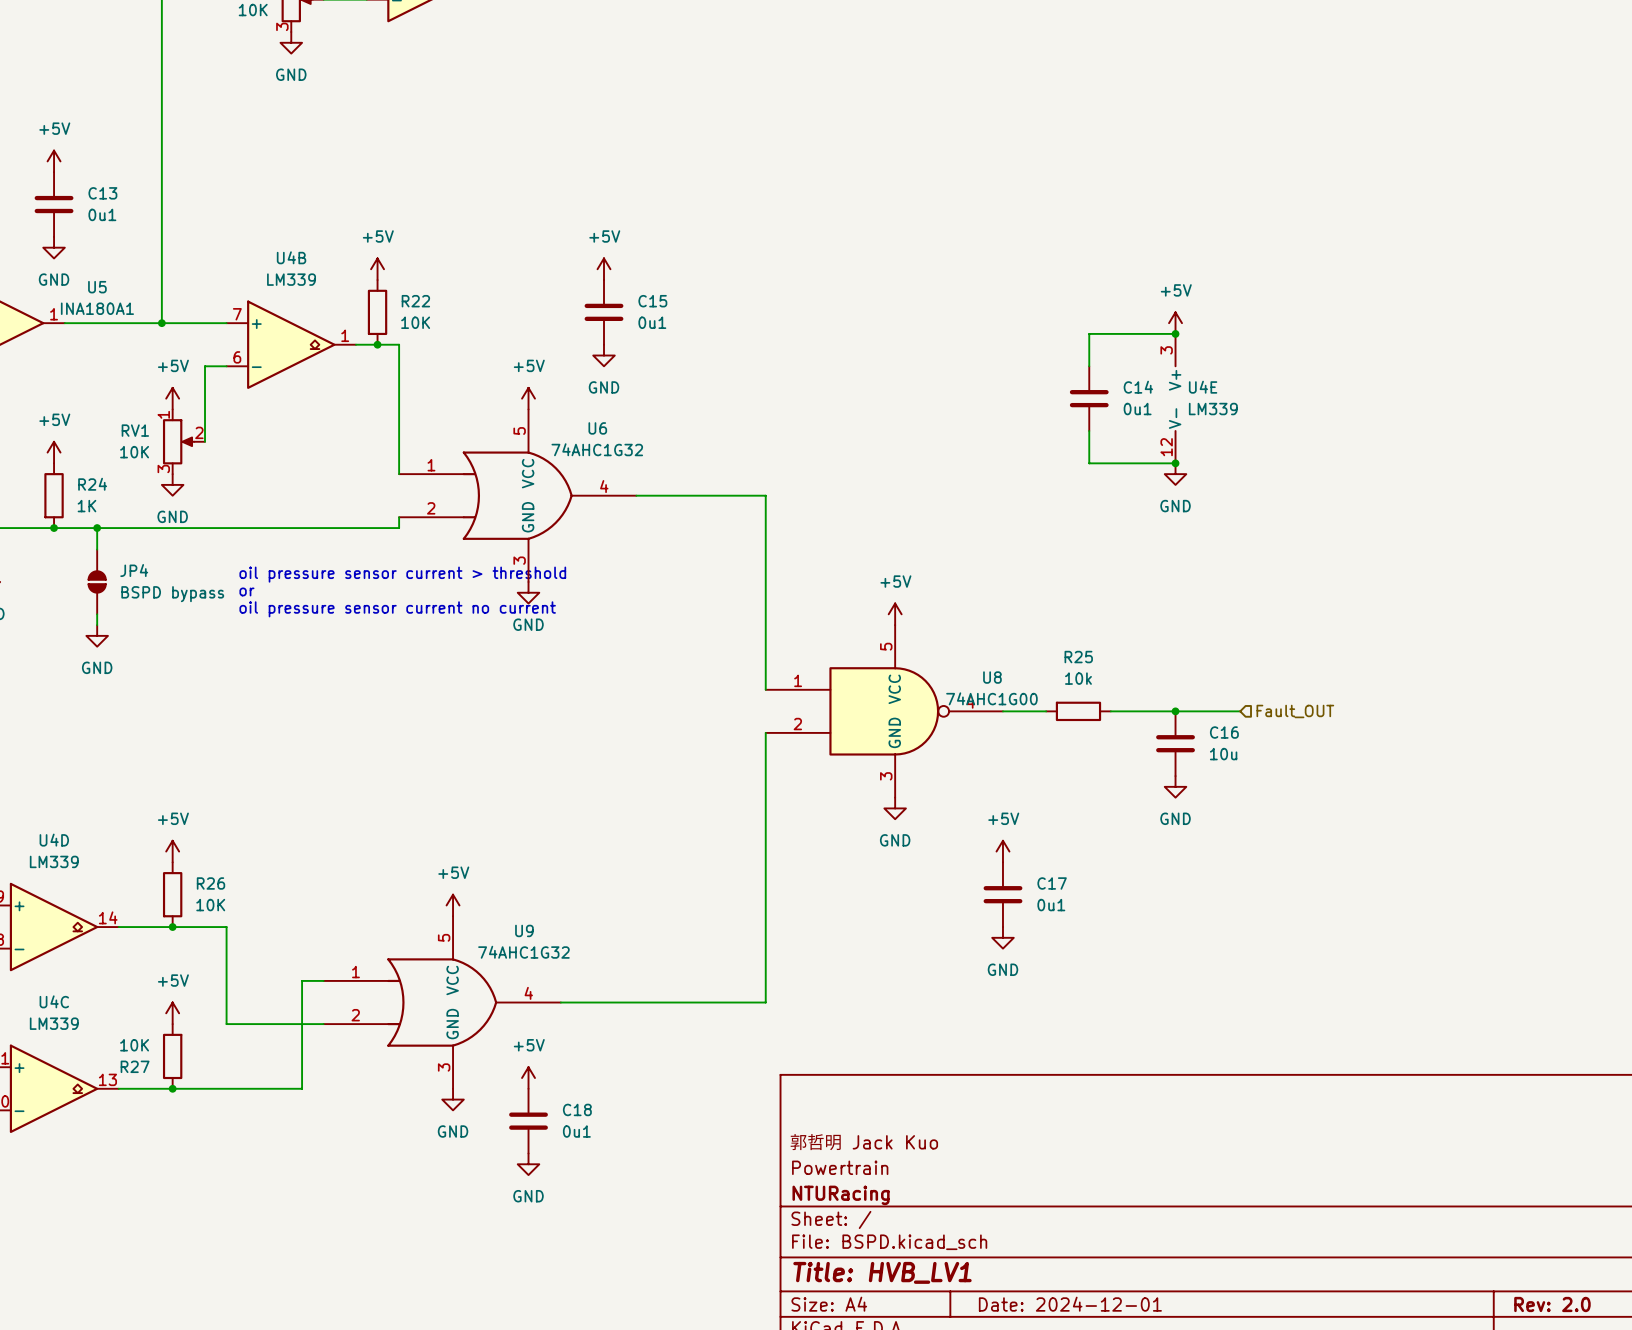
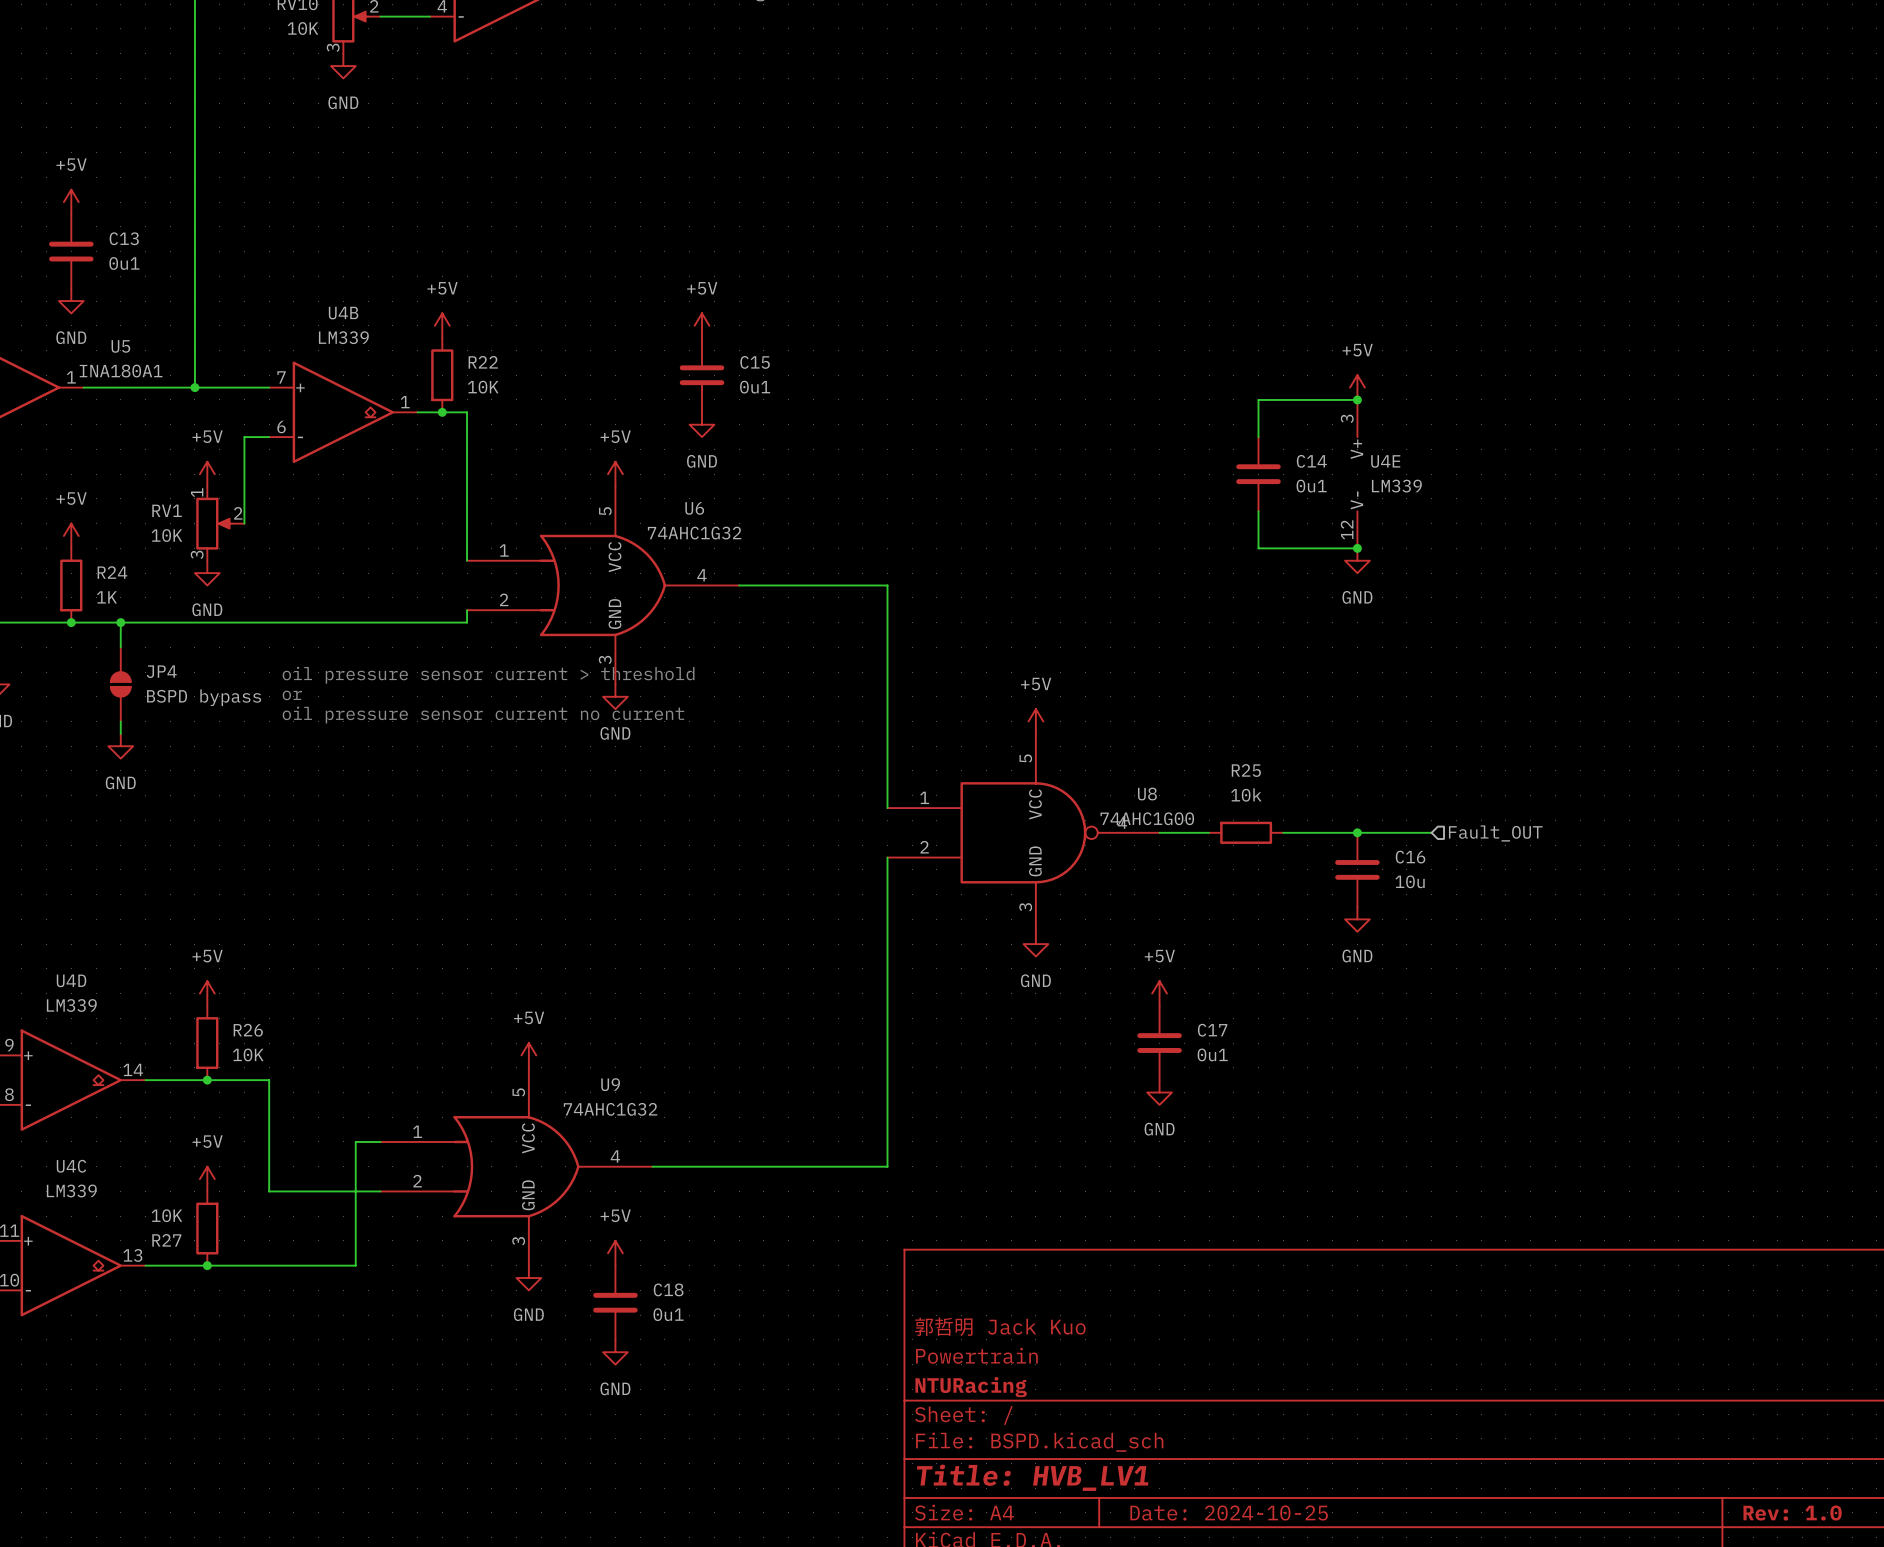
title block: Date: 2024-12-01 (1070, 1304) -> Date: 2024-10-25 (1229, 1513)
title block: Rev: 2.0 (1552, 1304) -> Rev: 1.0 (1792, 1513)

